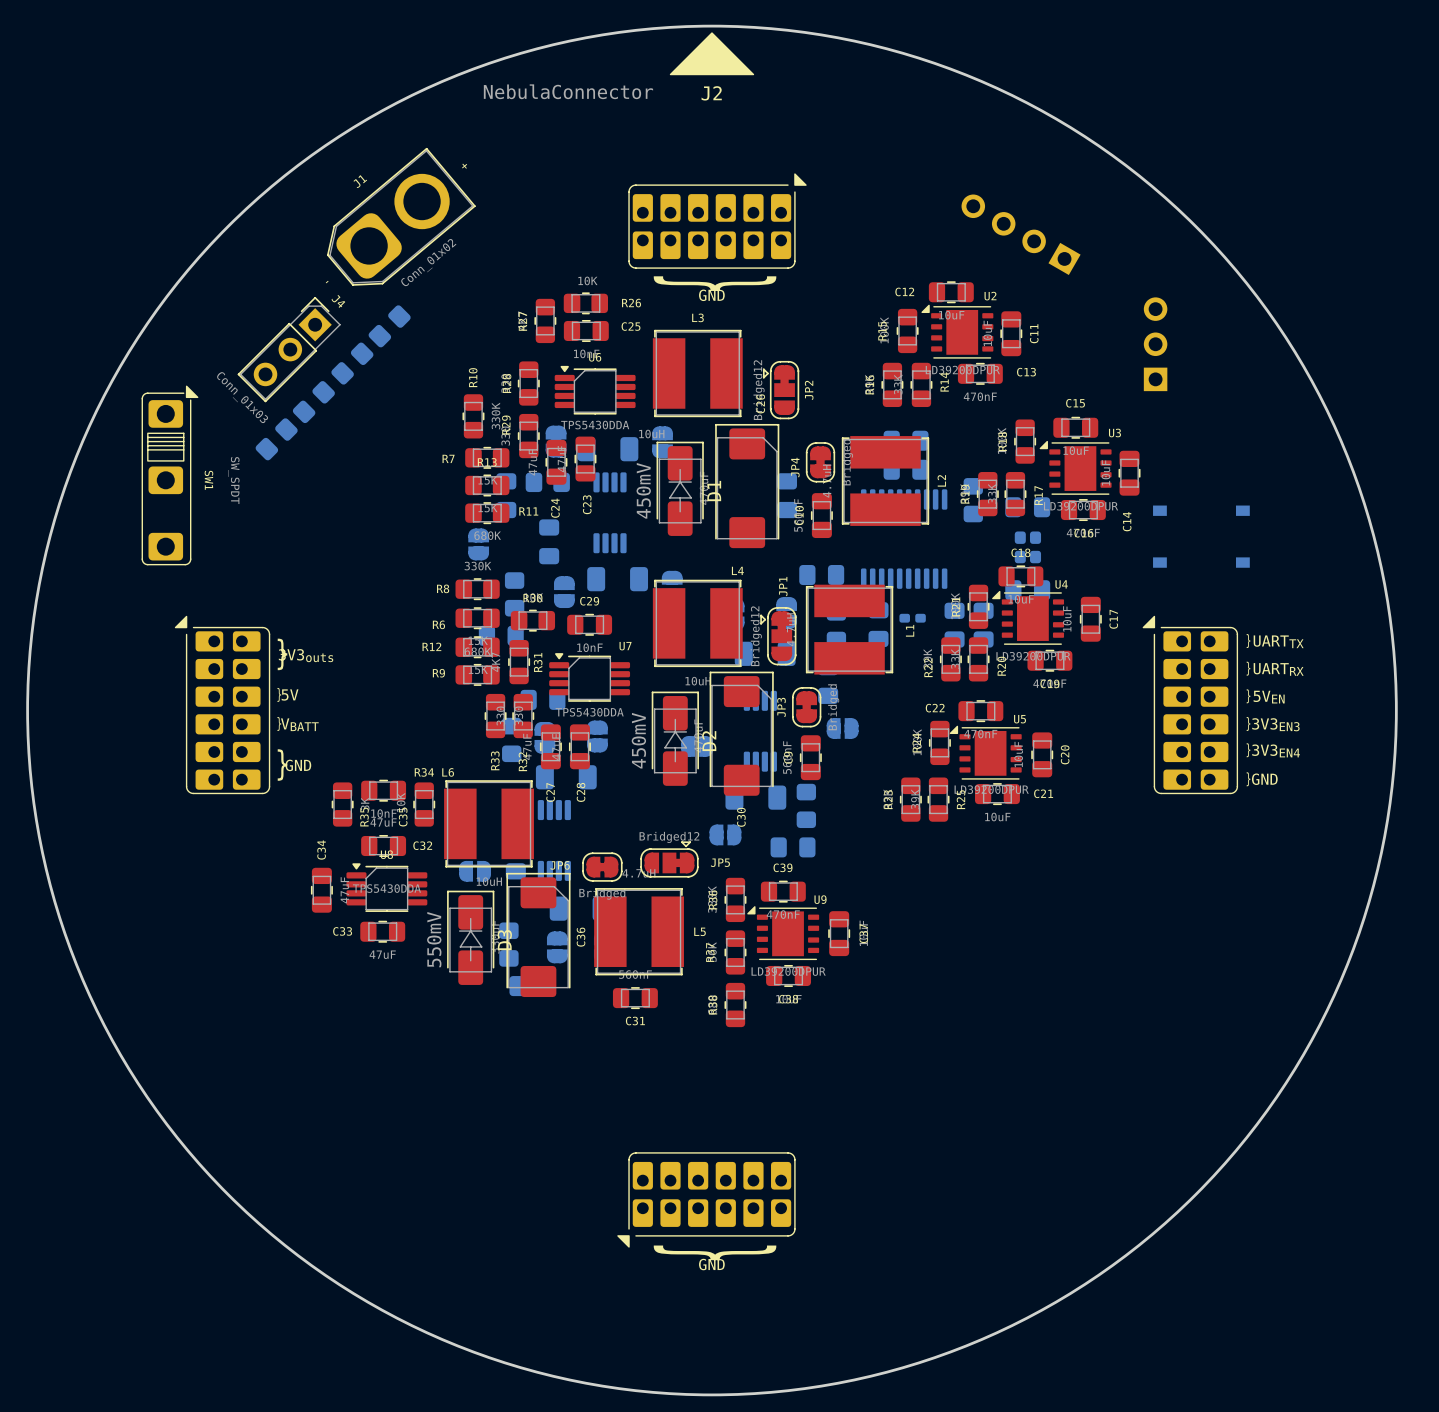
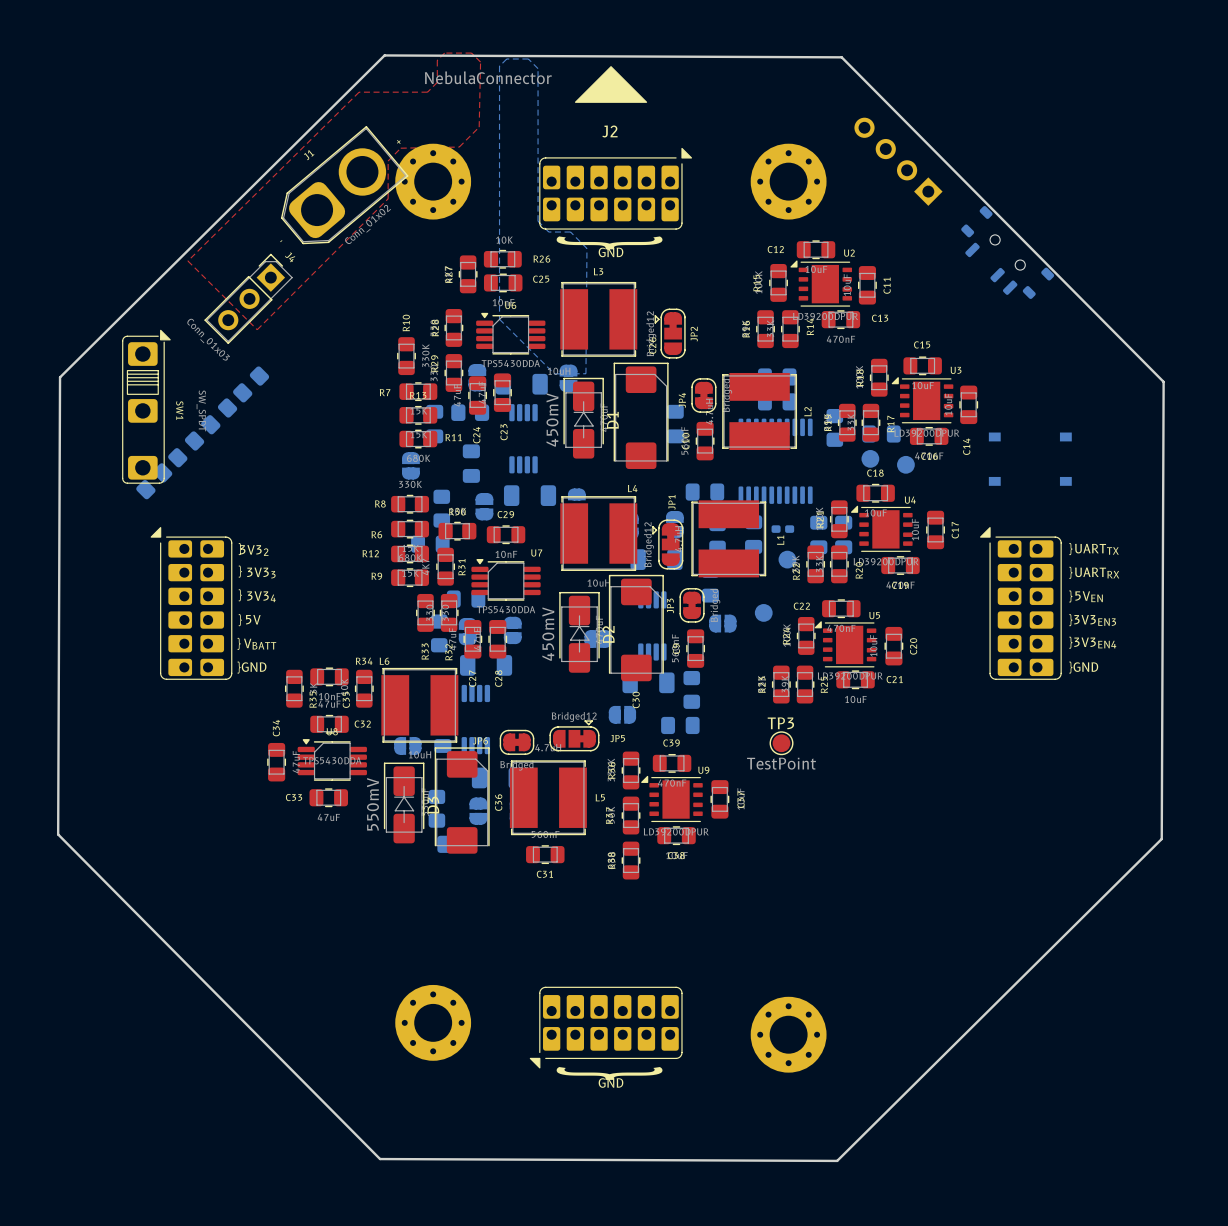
J2 footprint: [26, 24, 1398, 1397] -> [56, 54, 1165, 1163]
top zone outline: none -> (444, 53) (471, 53) (480, 62) (479, 127) (459, 147) (400, 148) (388, 161) (388, 198) (257, 329) (187, 261) (359, 92) (427, 92) (437, 82) (437, 60) (444, 53)
bottom zone outline: none -> (506, 59) (499, 66) (499, 319) (554, 373) (585, 373) (586, 248) (570, 232) (548, 232) (538, 221) (538, 68) (528, 59) (506, 59)
J2 name position: J2 (711, 93) -> J2 (609, 131)
part: none -> (898, 161)
part: (1021, 234) -> none
part: none -> (1007, 252)
part: (389, 326) -> none
part: (1155, 344) -> none
part: (352, 363) -> none
part: (313, 402) -> none
part position: (276, 439) -> (251, 384)
part: none -> (219, 416)
part: none -> (186, 449)
part: none -> (870, 458)
part: none -> (905, 464)
part: (1027, 547) -> none
part: none -> (154, 481)
part: (1027, 590) -> none
part: none -> (787, 559)
part: none -> (763, 612)
TP3: none -> TestPoint (781, 743)

